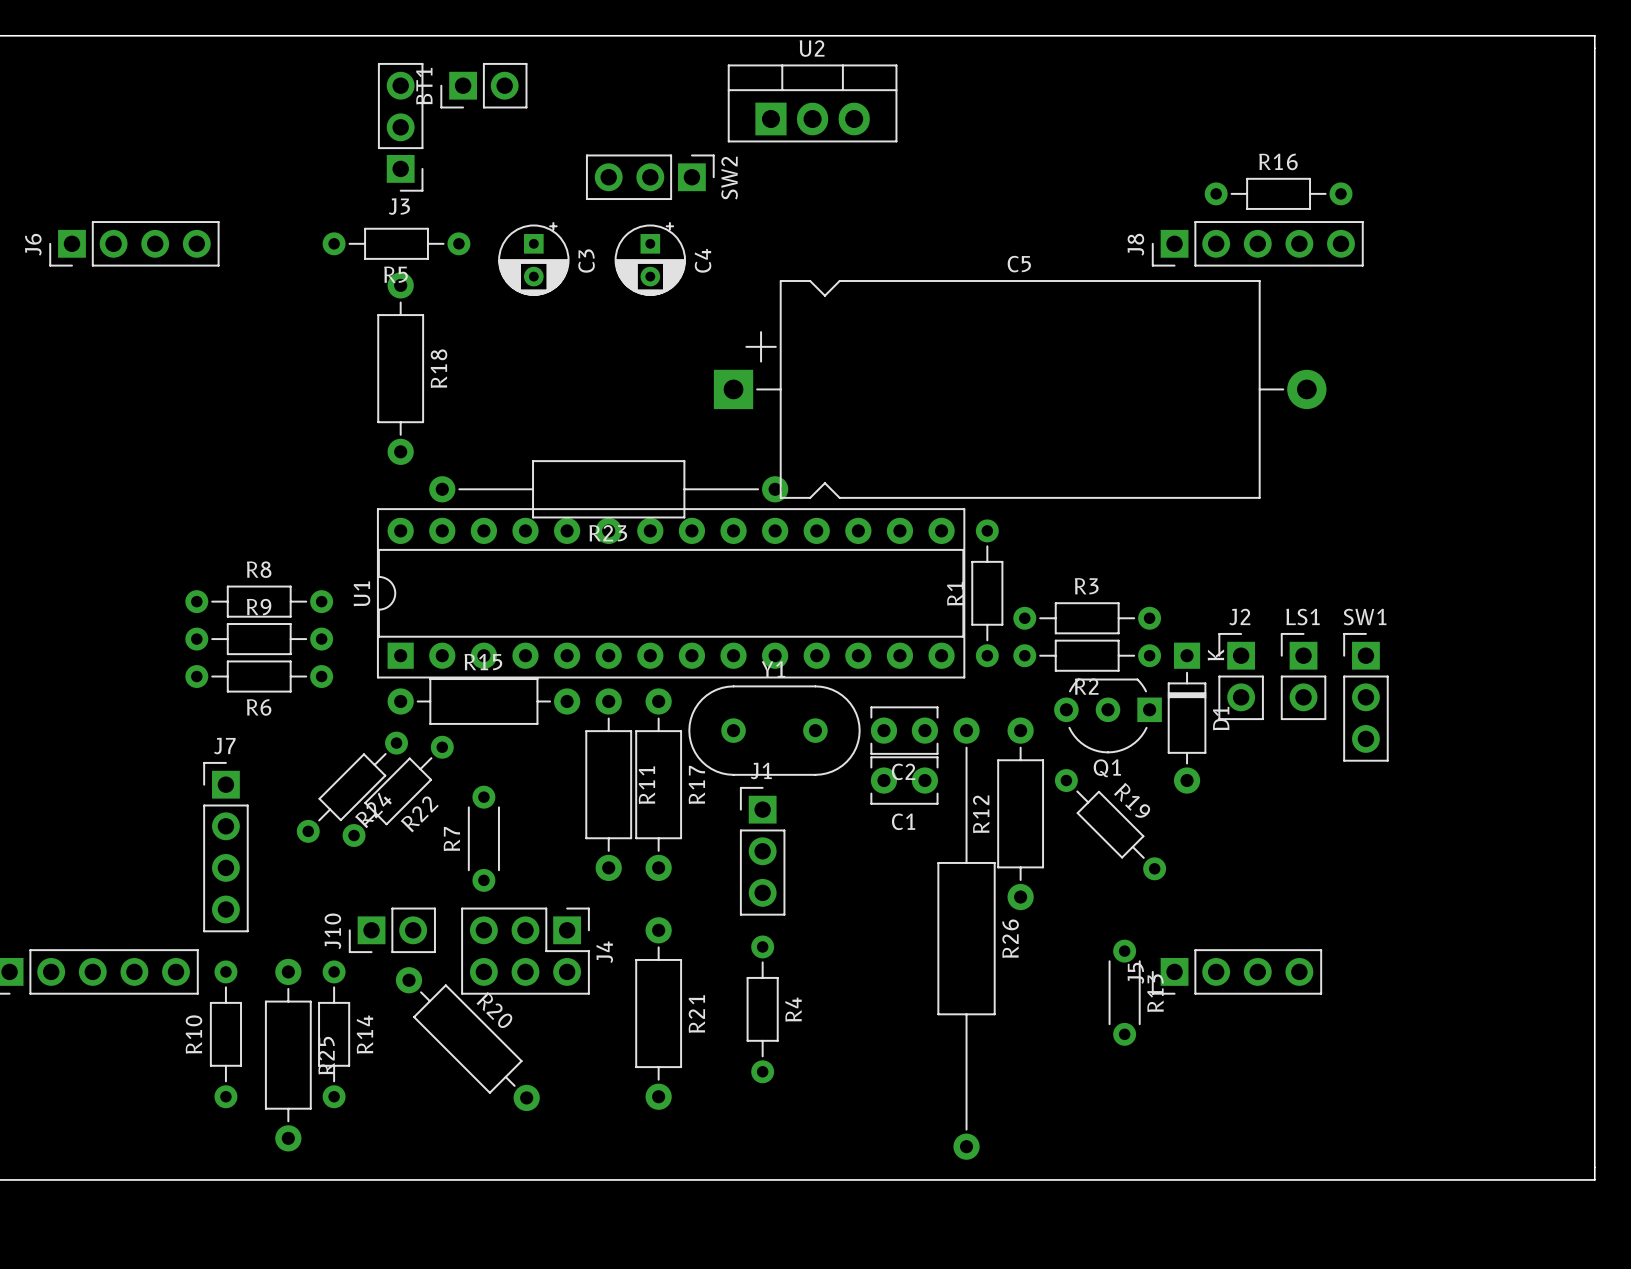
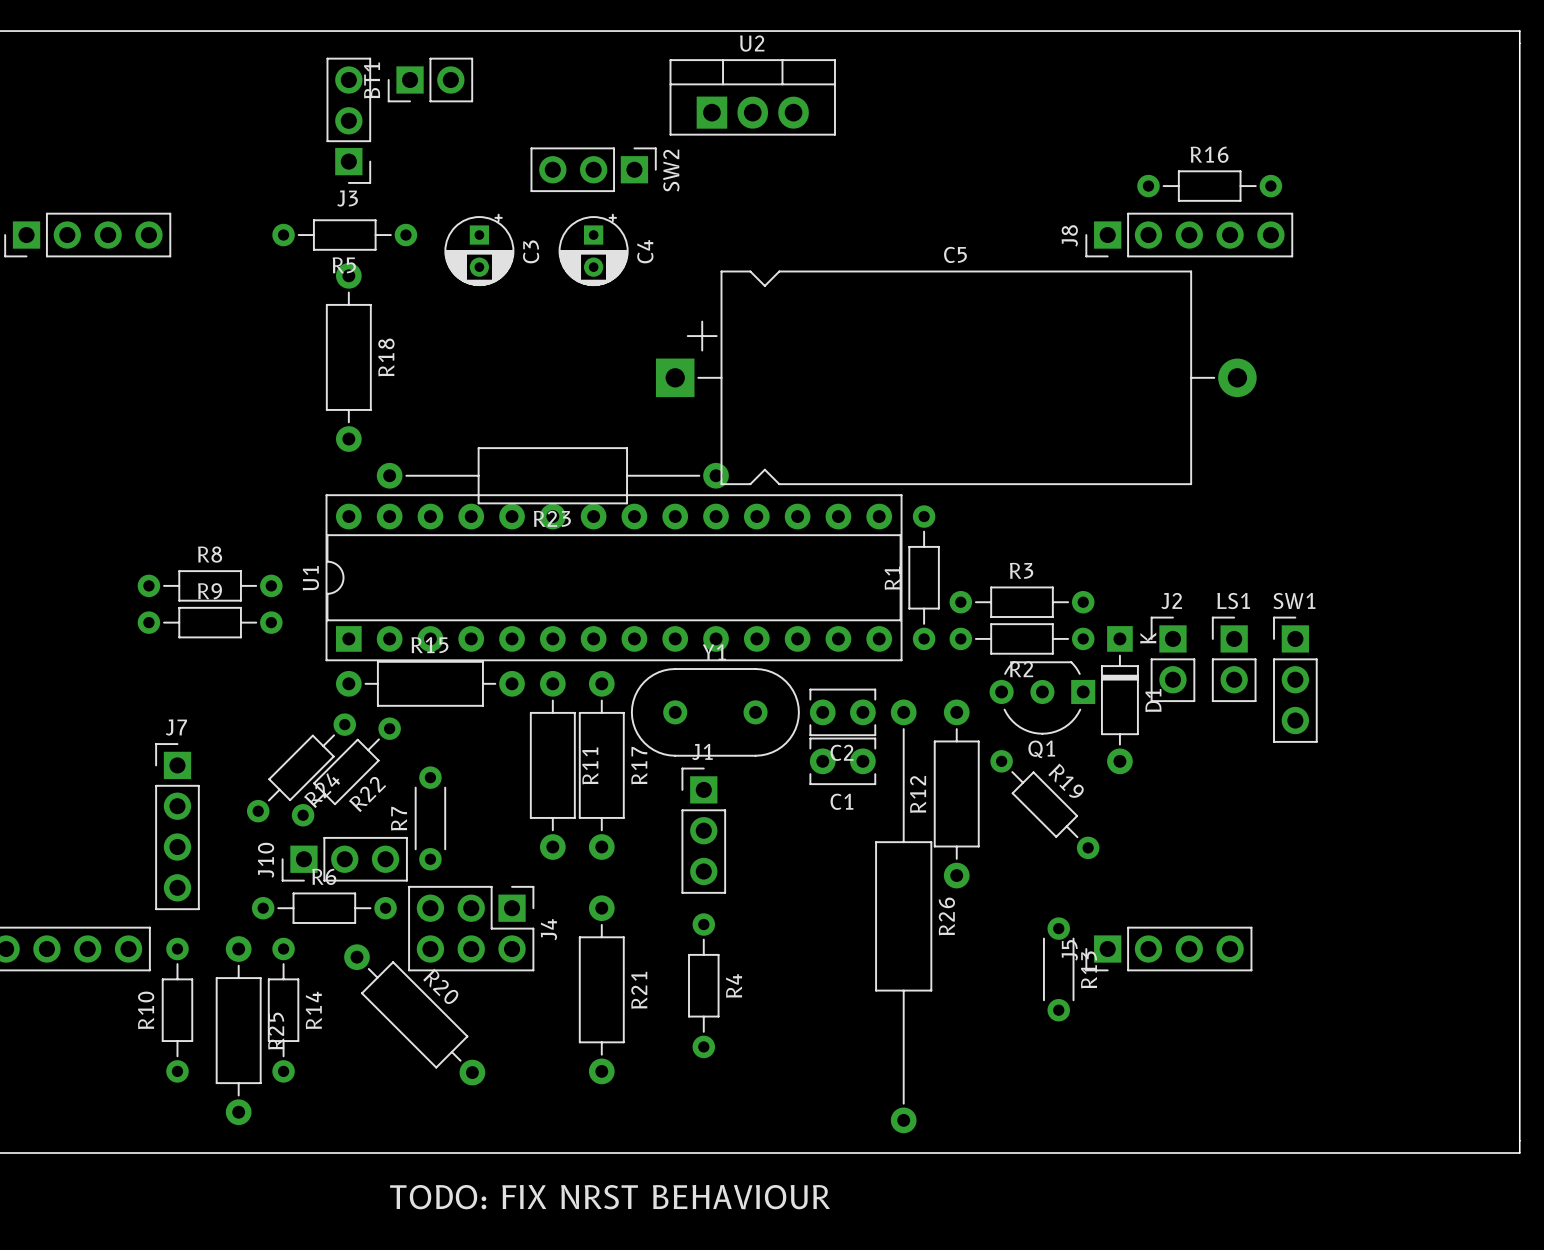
R6 position: (259, 676) -> (324, 908)
R6 name position: R6 (259, 707) -> R6 (324, 876)
J10 footprint: [348, 907, 436, 954] -> [281, 836, 408, 882]
text: none -> TODO: FIX NRST BEHAVIOUR (610, 1197)

